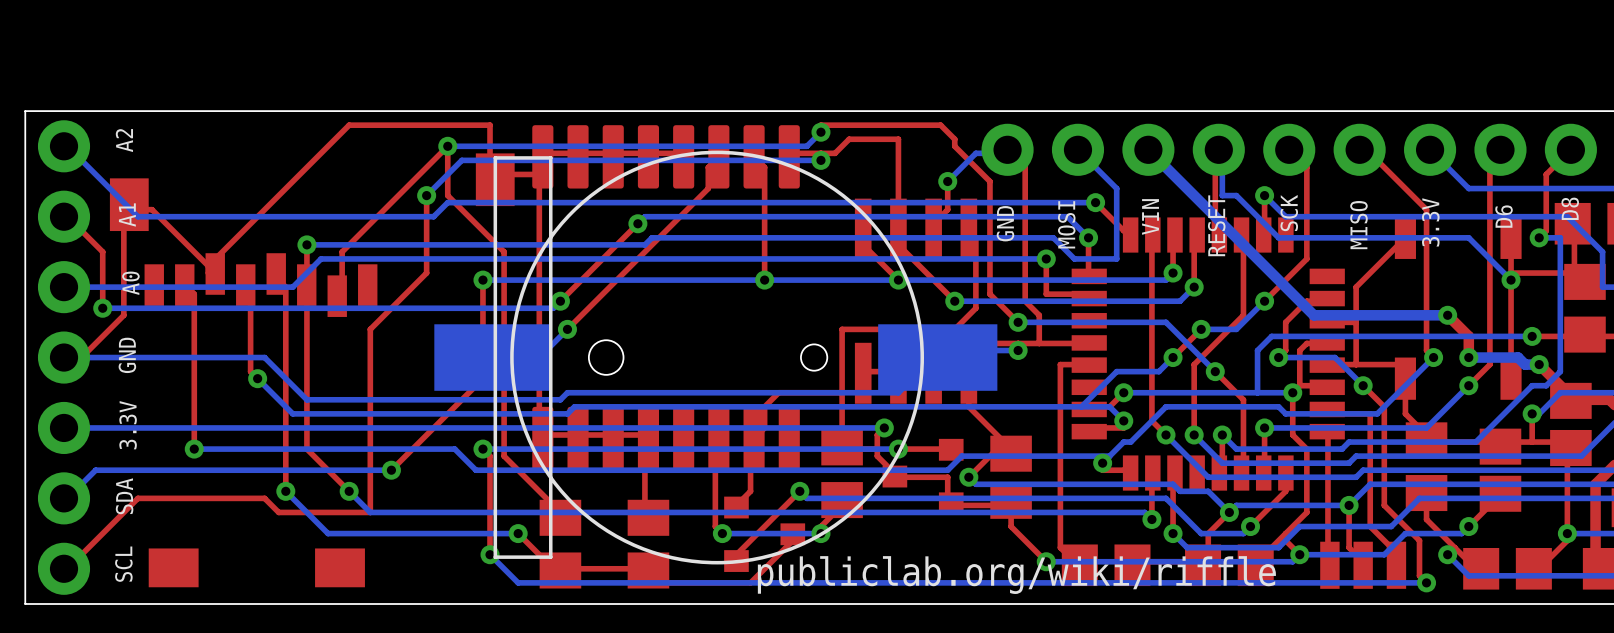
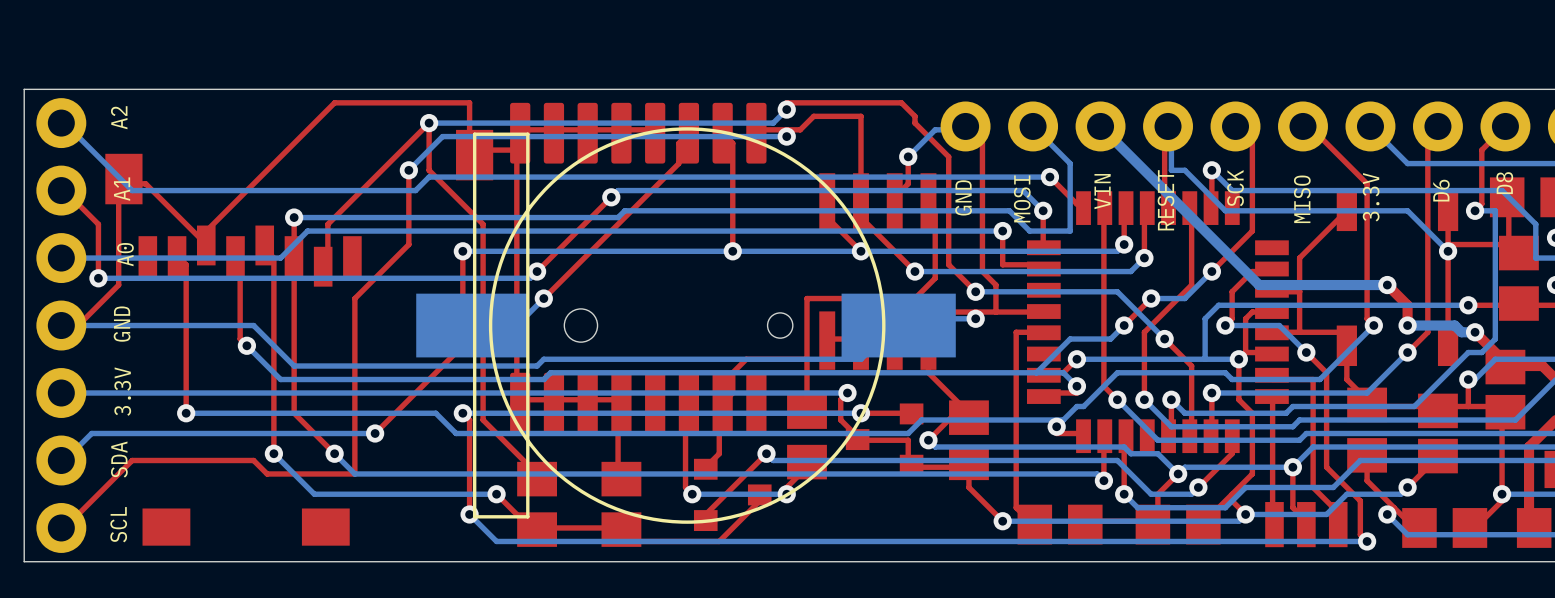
text: publiclab.org/wiki/riffle (1016, 575) -> none

